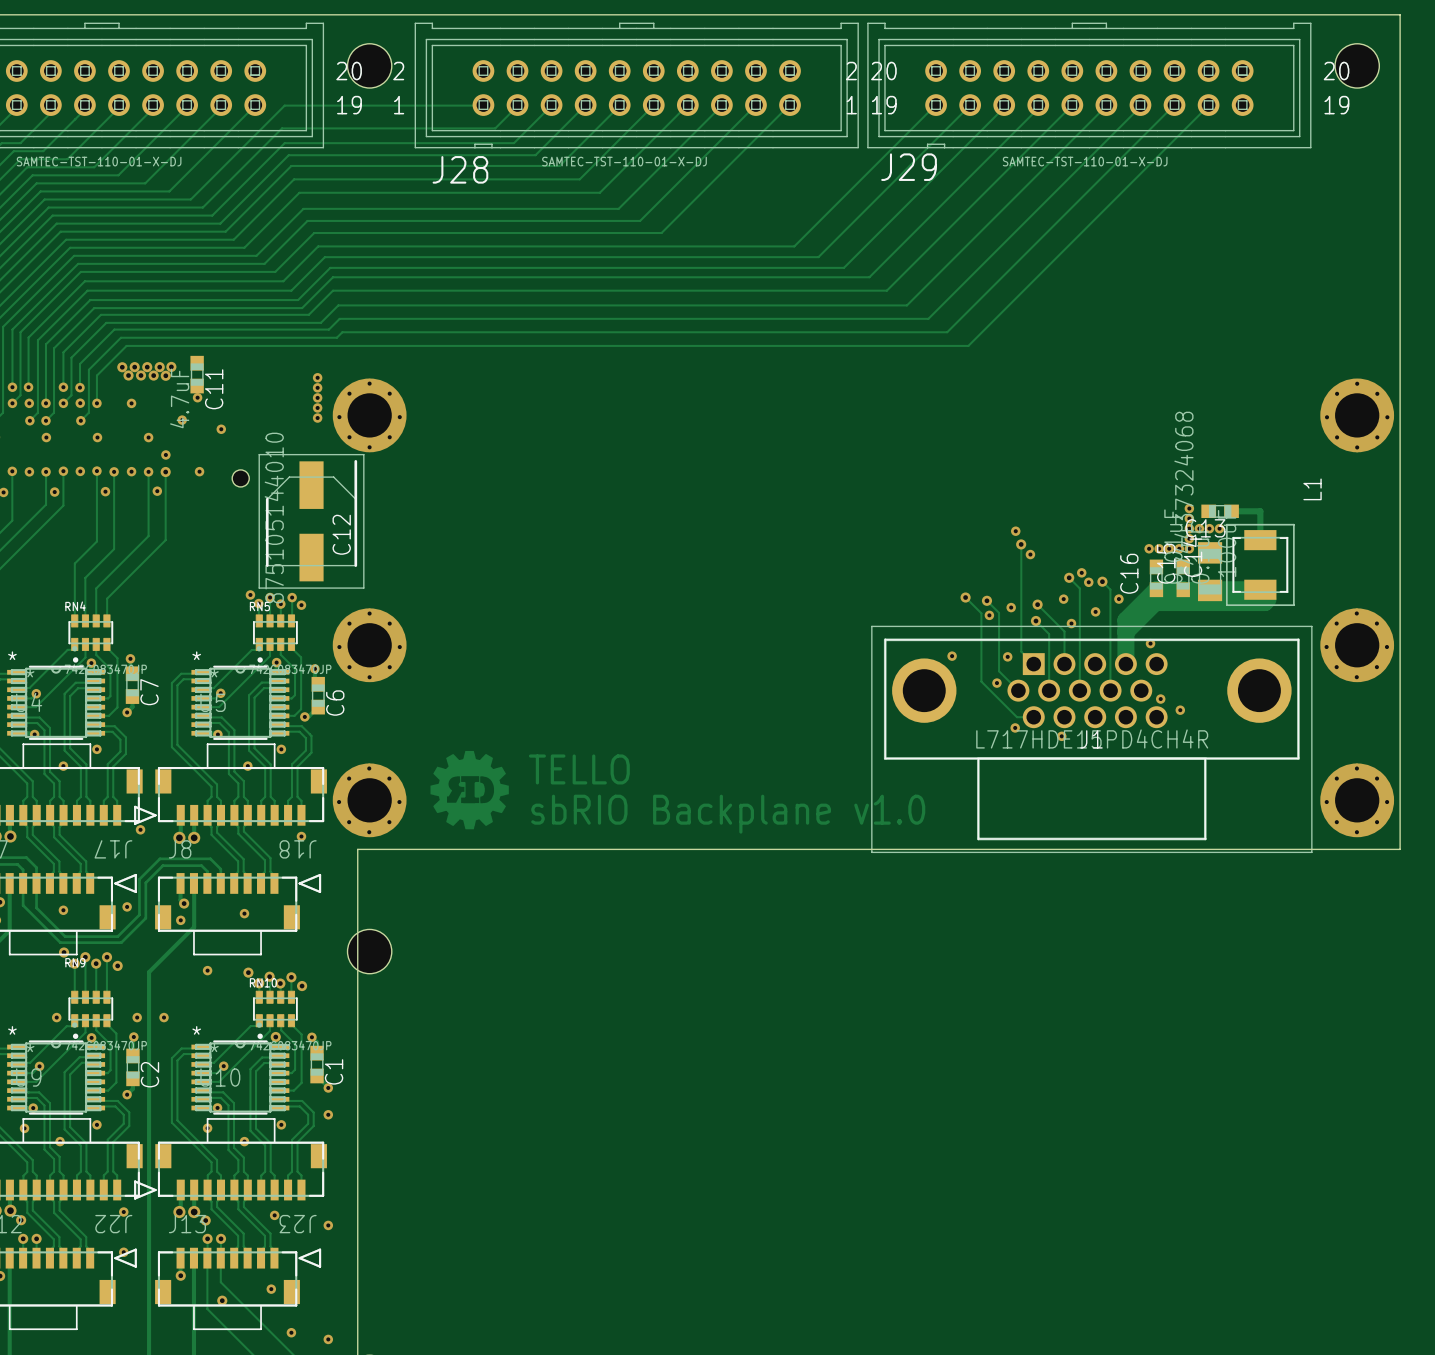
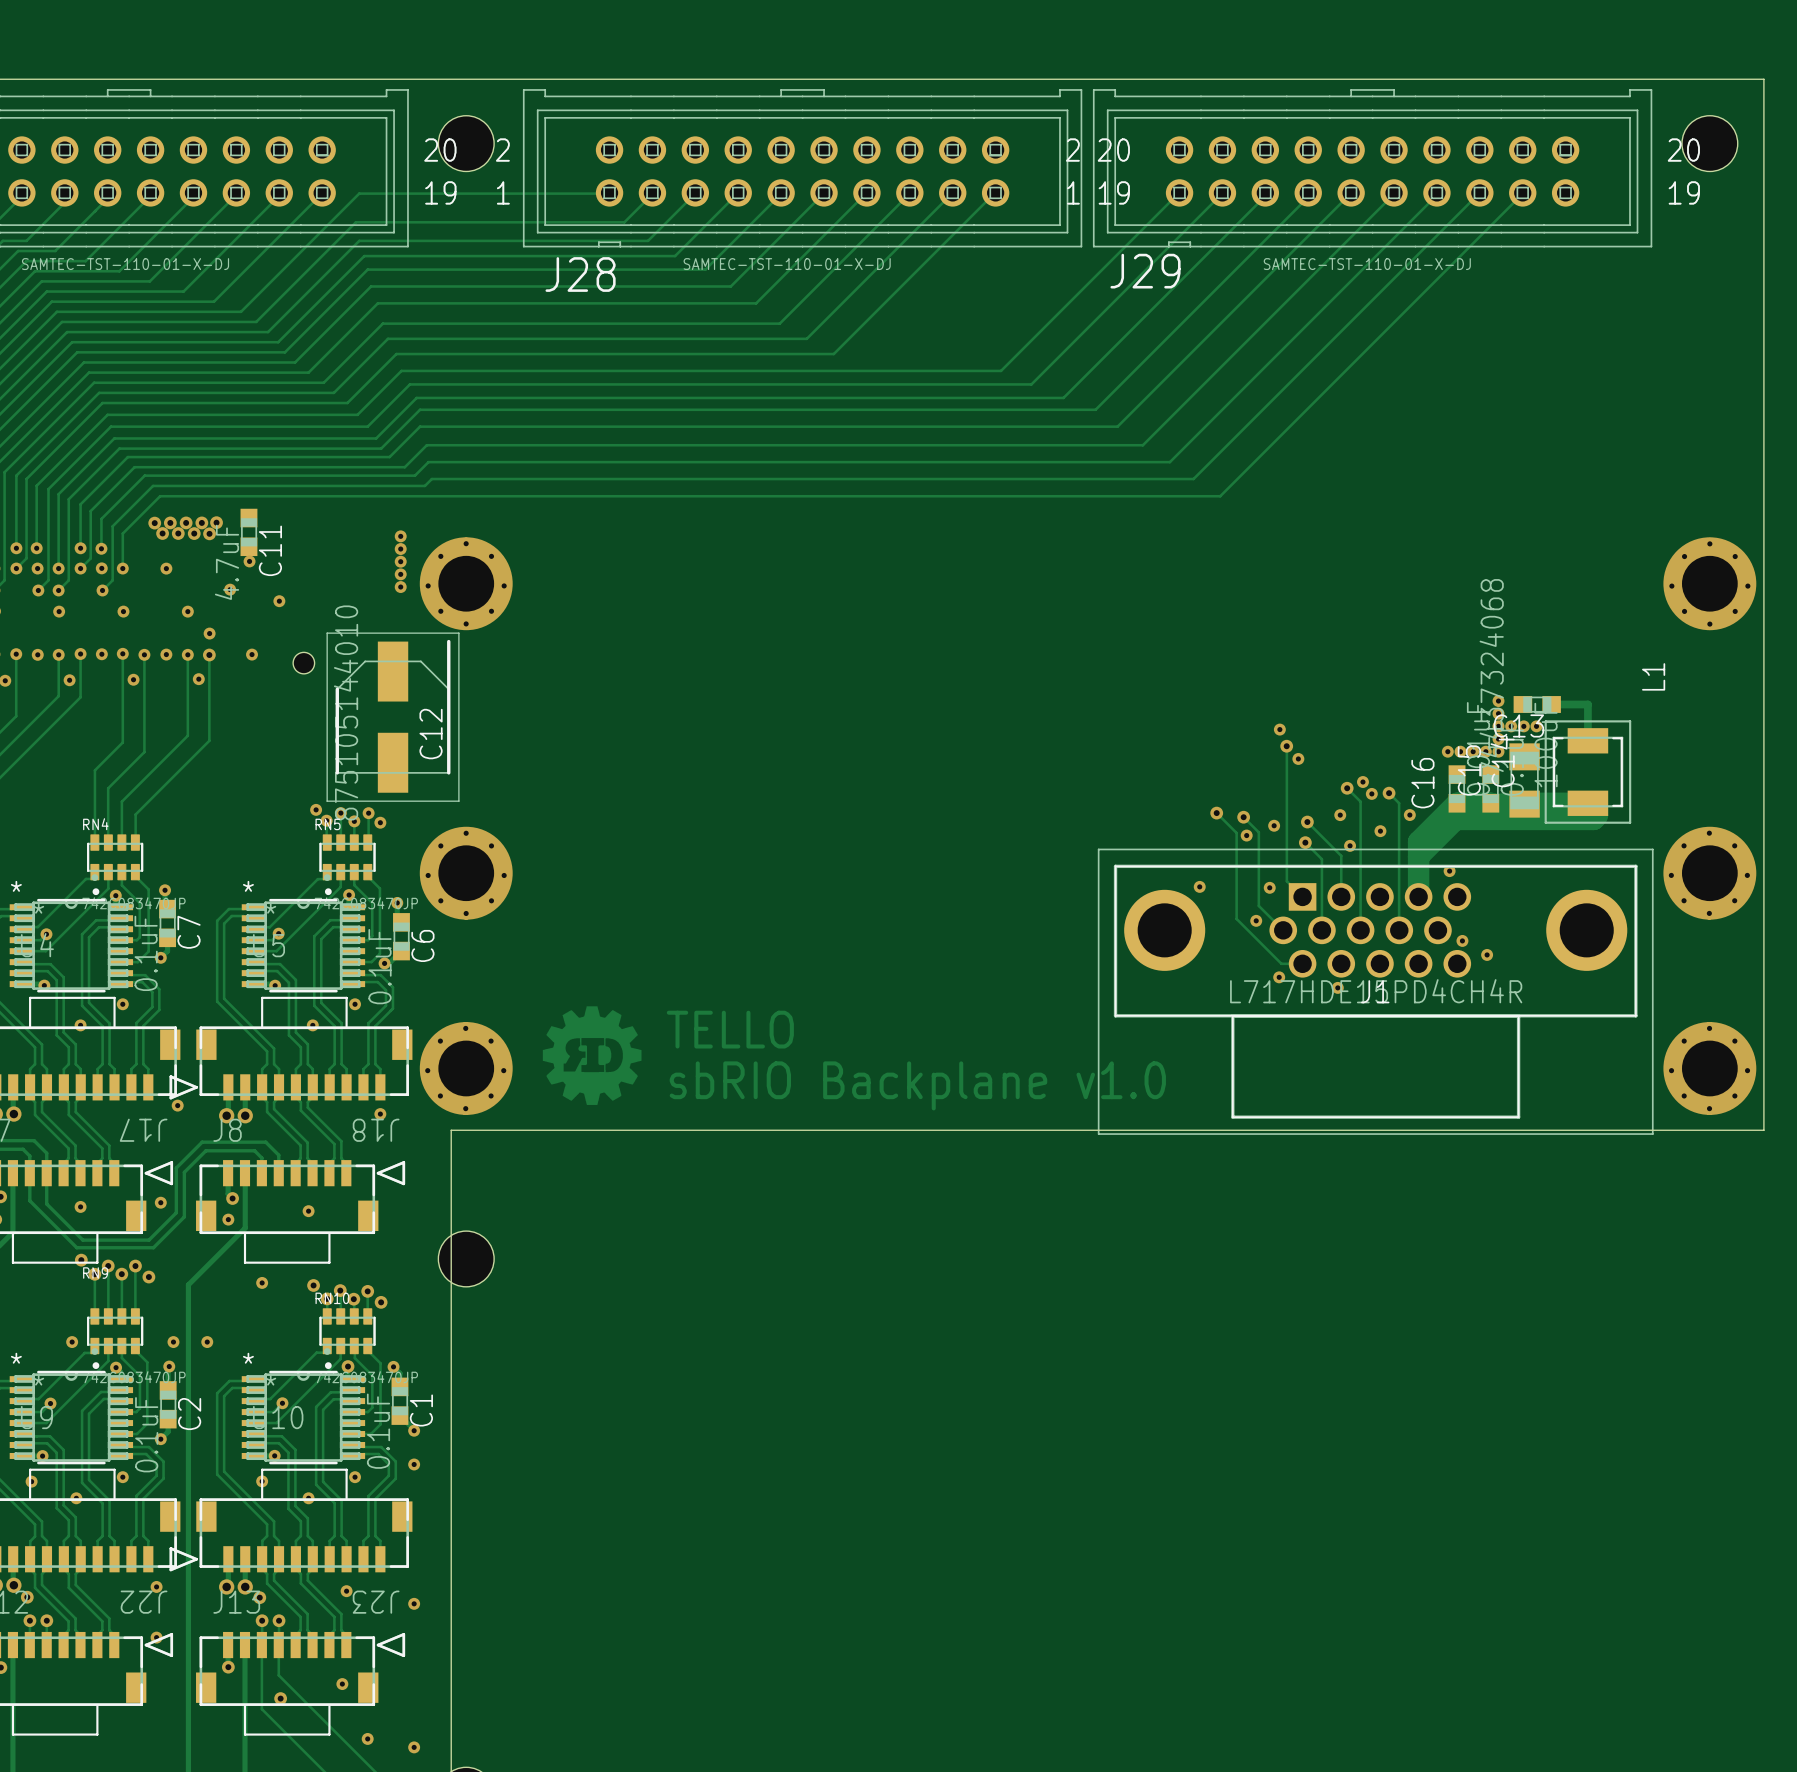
C7 value: none -> 0.1uF (146, 953)
C6 value: none -> 0.1uF (380, 966)
C1 value: none -> 0.1uF (378, 1431)
C2 value: none -> 0.1uF (146, 1434)

